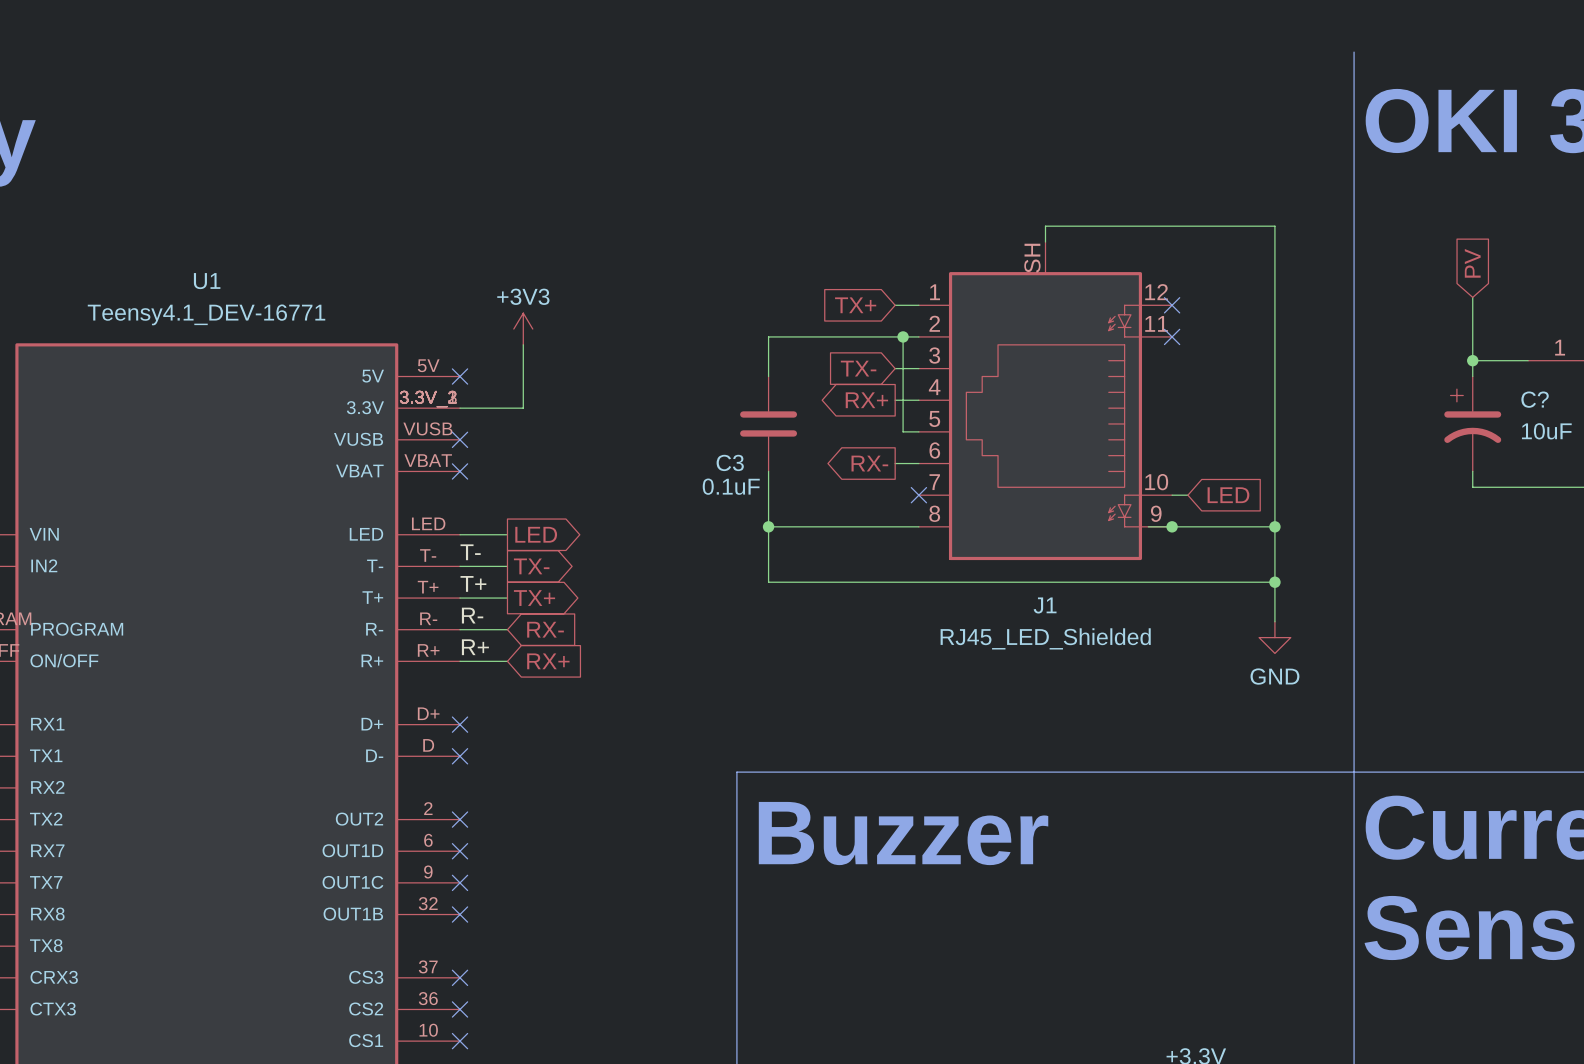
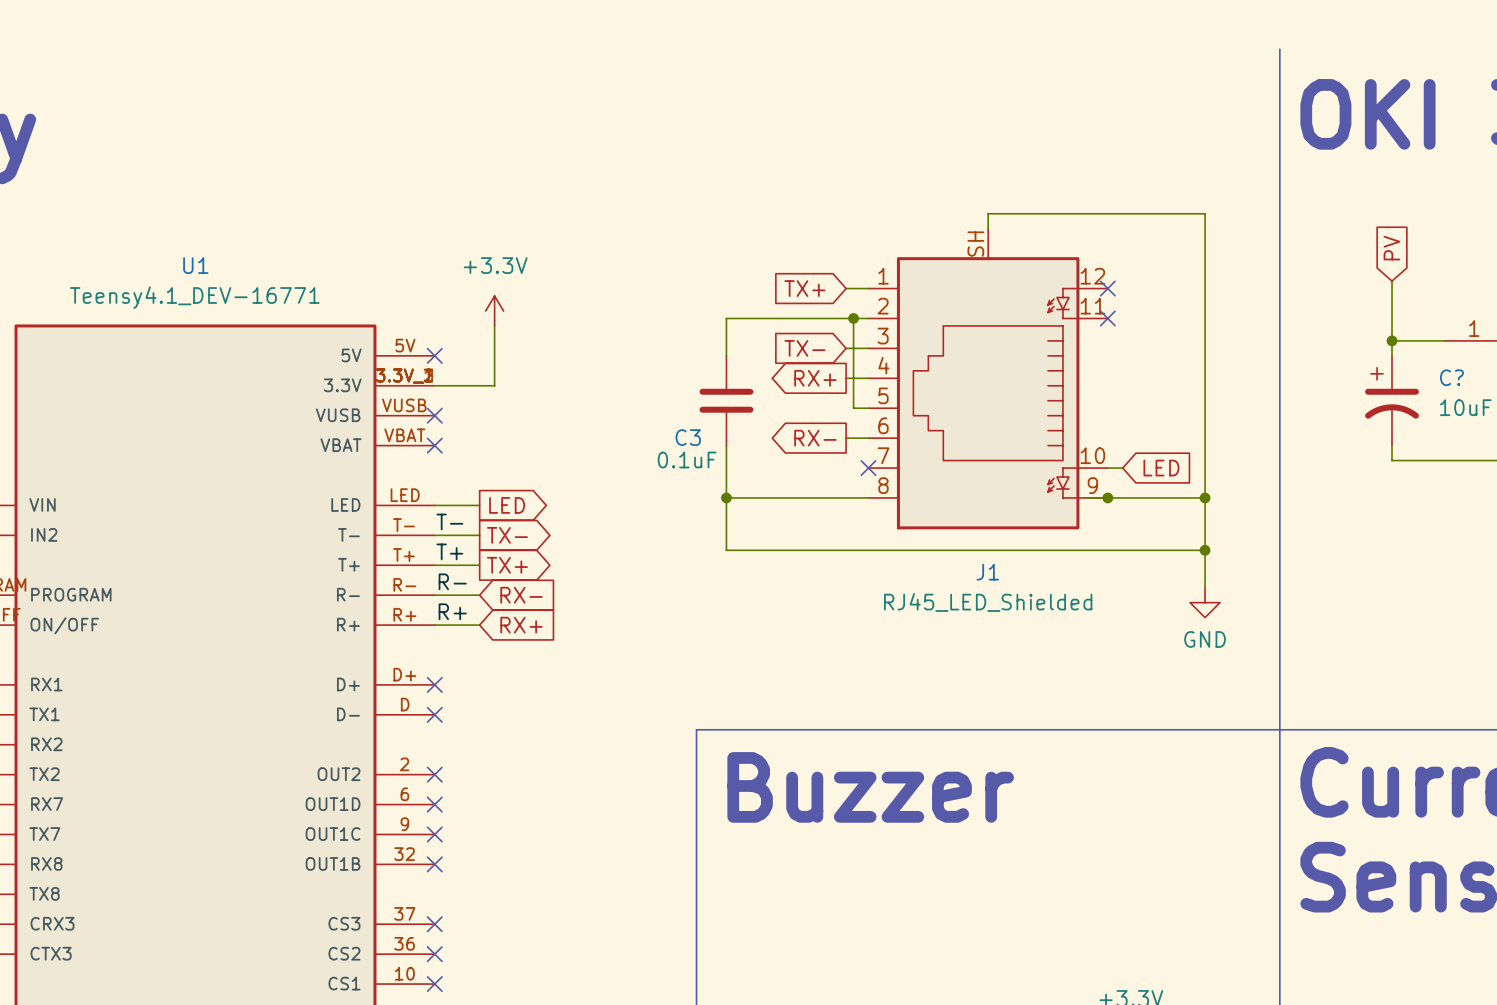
power symbol: +3V3 (523, 329) -> +3.3V (494, 311)

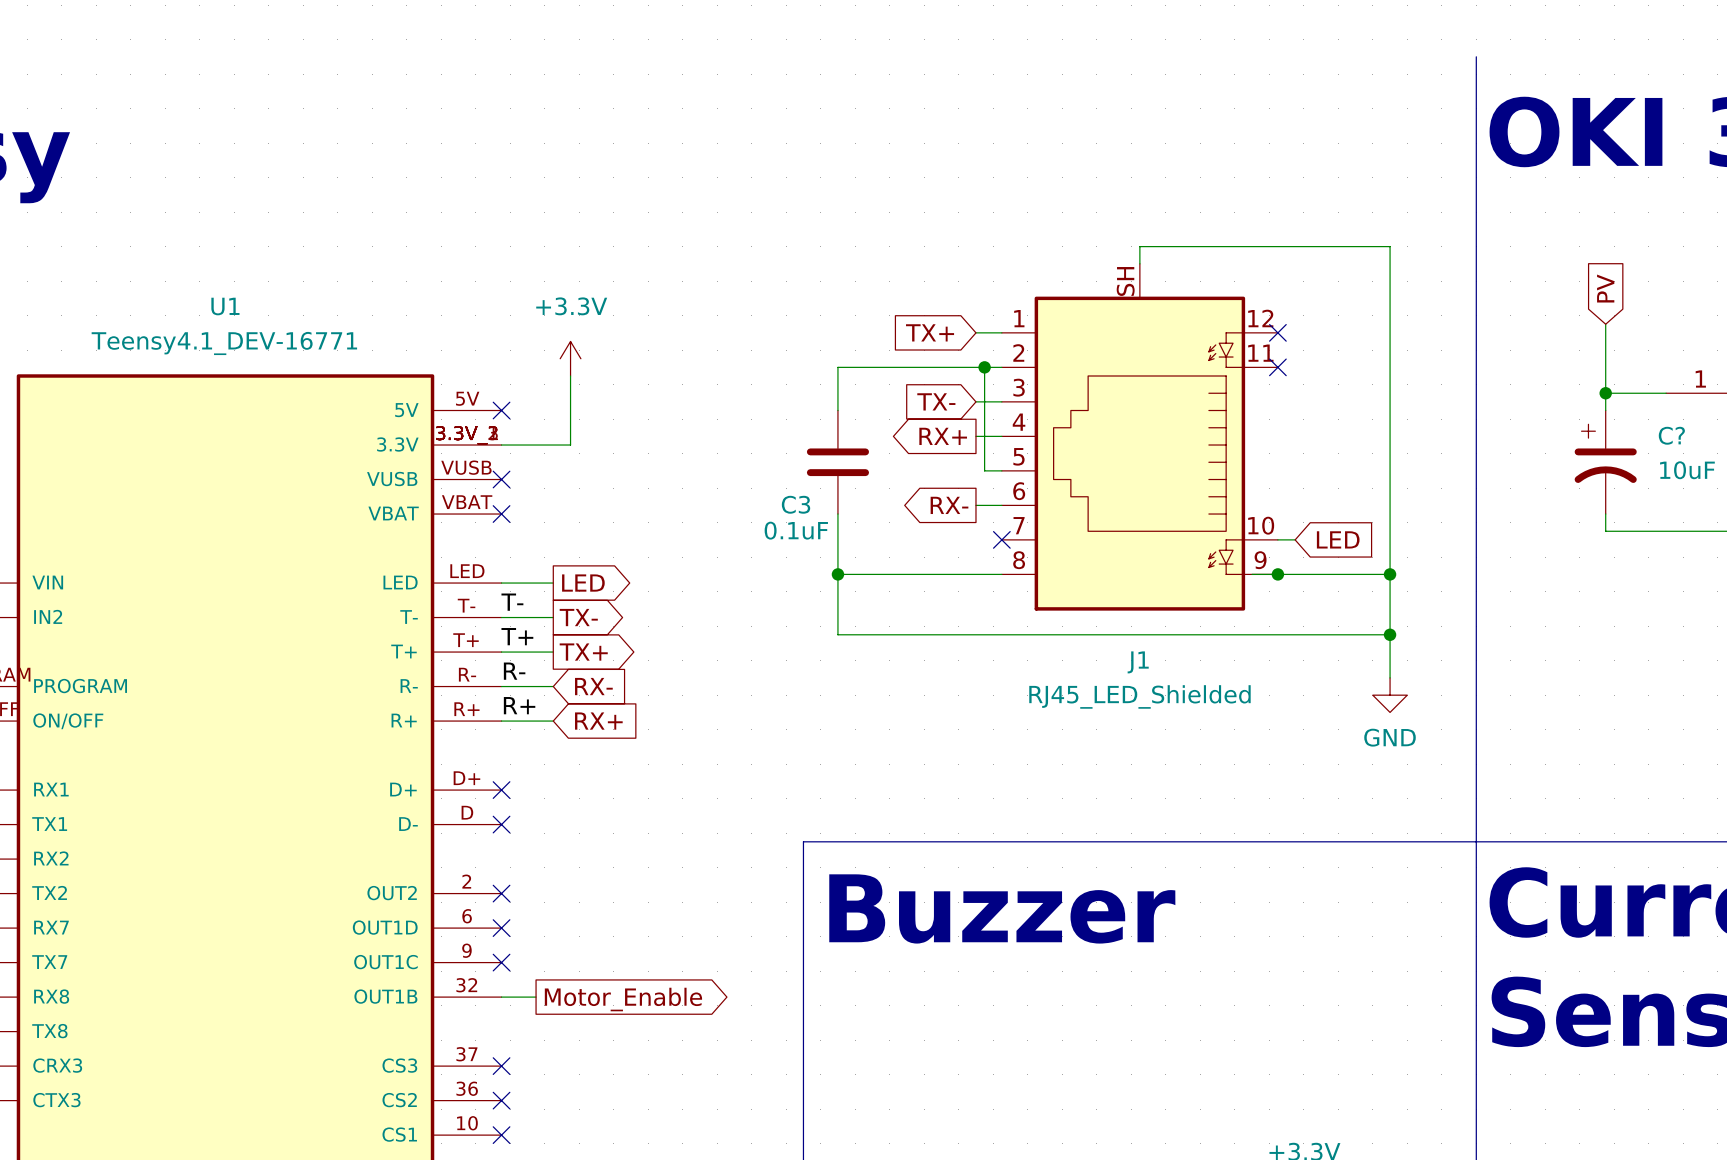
wire: none -> (501, 997) (536, 997)
no-connect mark: (434, 864) -> none
global label: none -> Motor_Enable (623, 999)

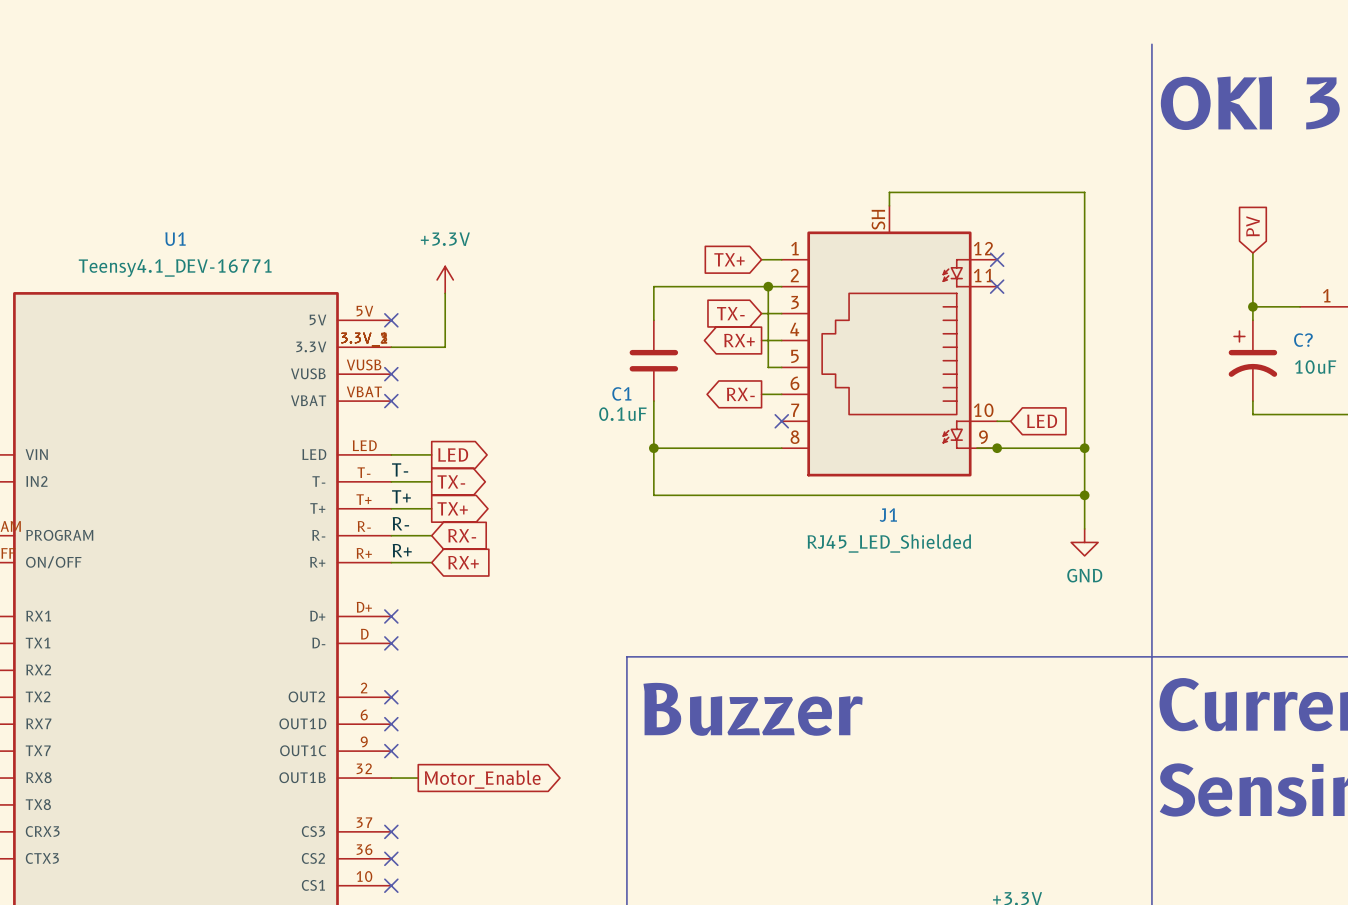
C3 name: C3 (796, 504) -> C1 (621, 393)

